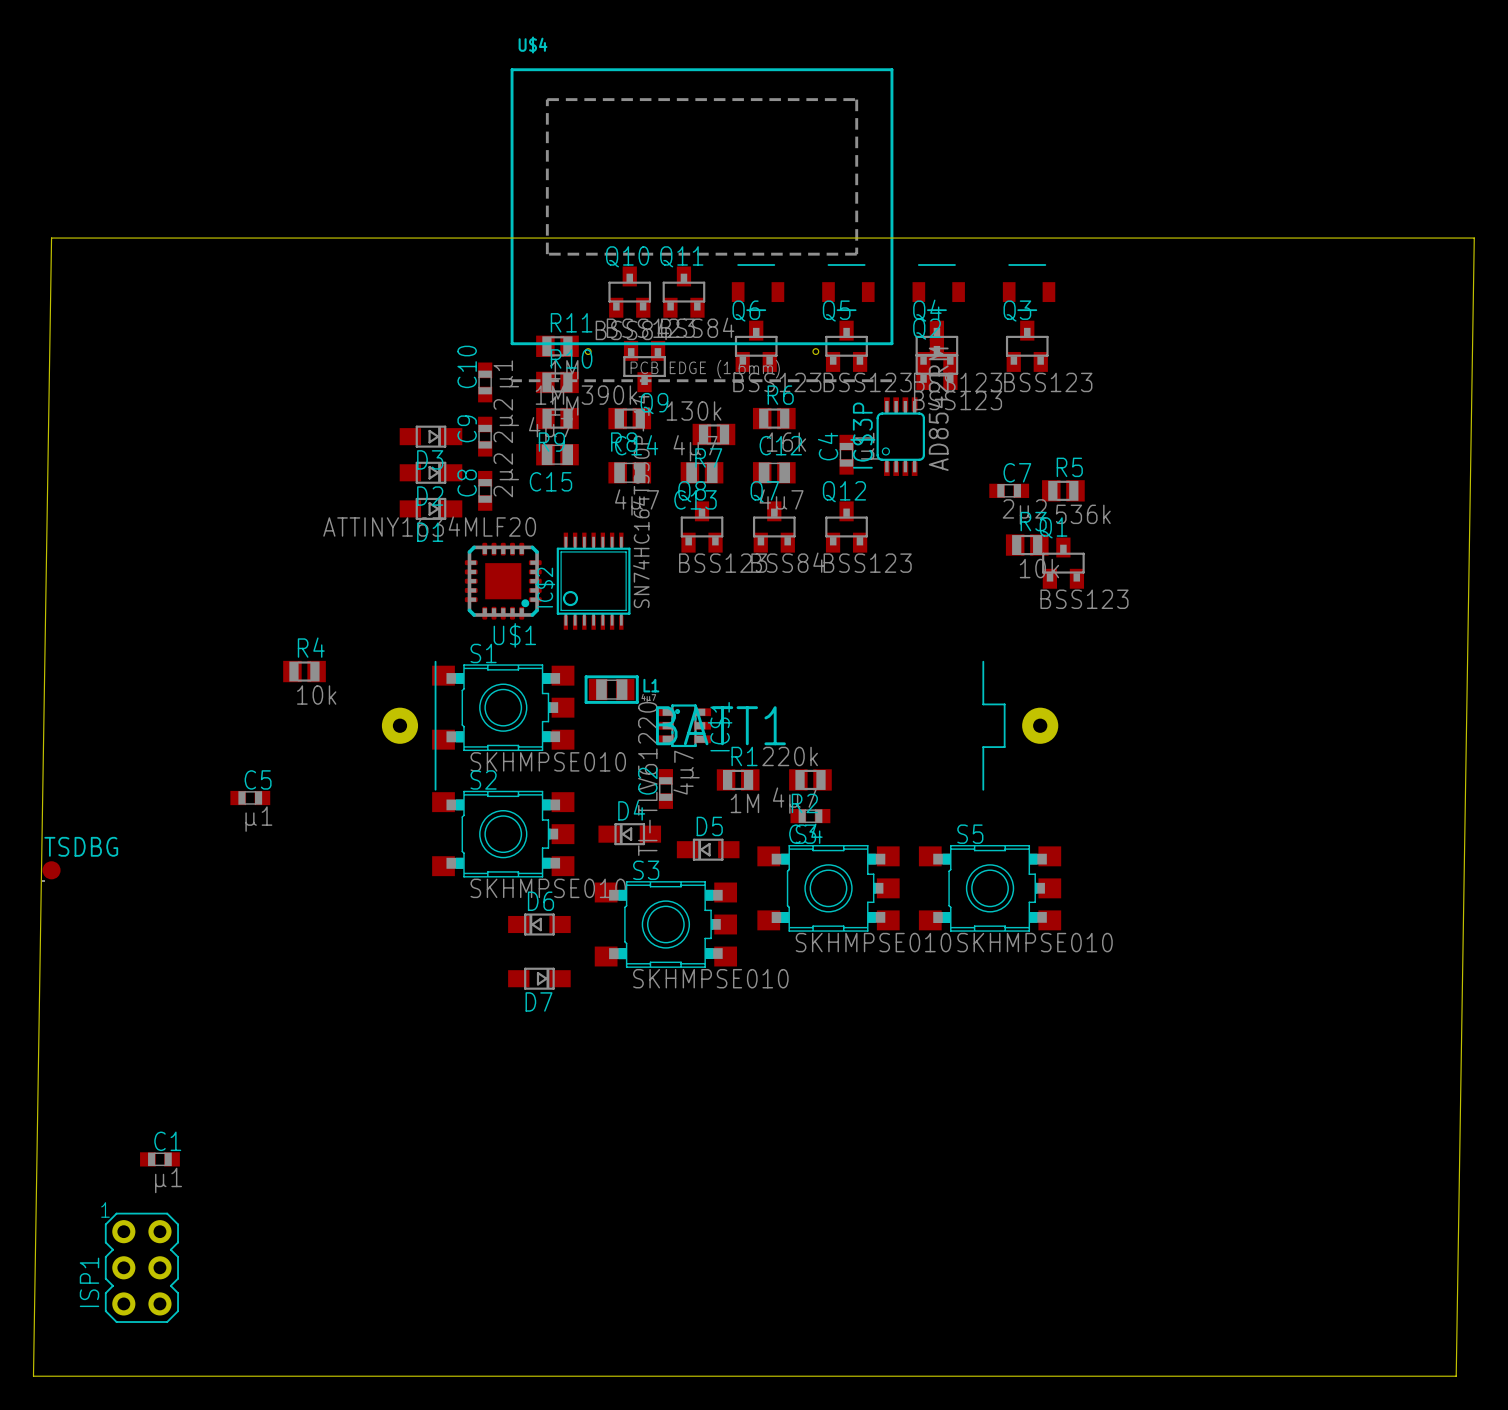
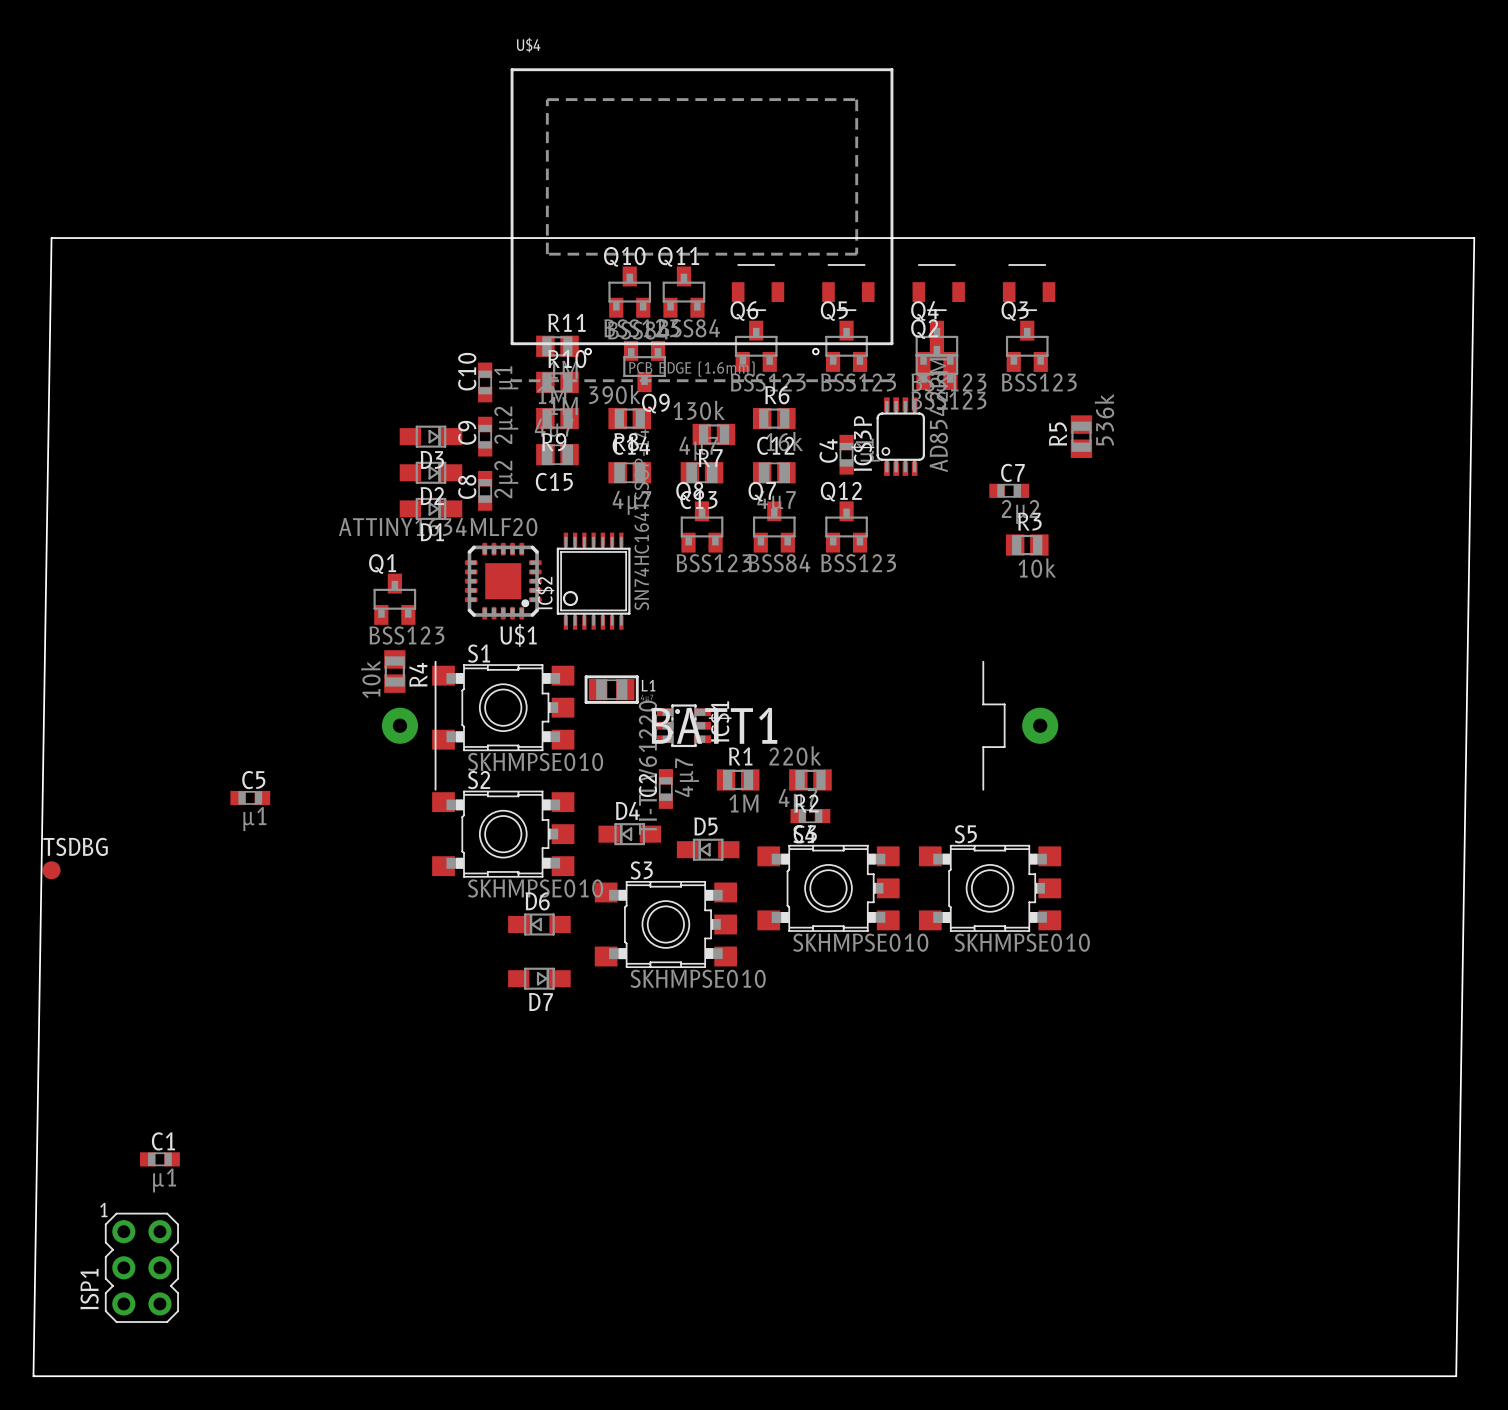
R5 name position: R5 (1069, 467) -> R5 (1058, 434)
R5 rotation: 0° (1063, 490) -> 90° clockwise (1081, 436)
R5 position: (1063, 490) -> (1081, 436)
R5 value position: 536k (1083, 514) -> 536k (1104, 419)
Q1 position: (1063, 563) -> (394, 599)
R4 rotation: 0° (304, 671) -> 90° clockwise (394, 671)
R4 position: (304, 671) -> (394, 671)

